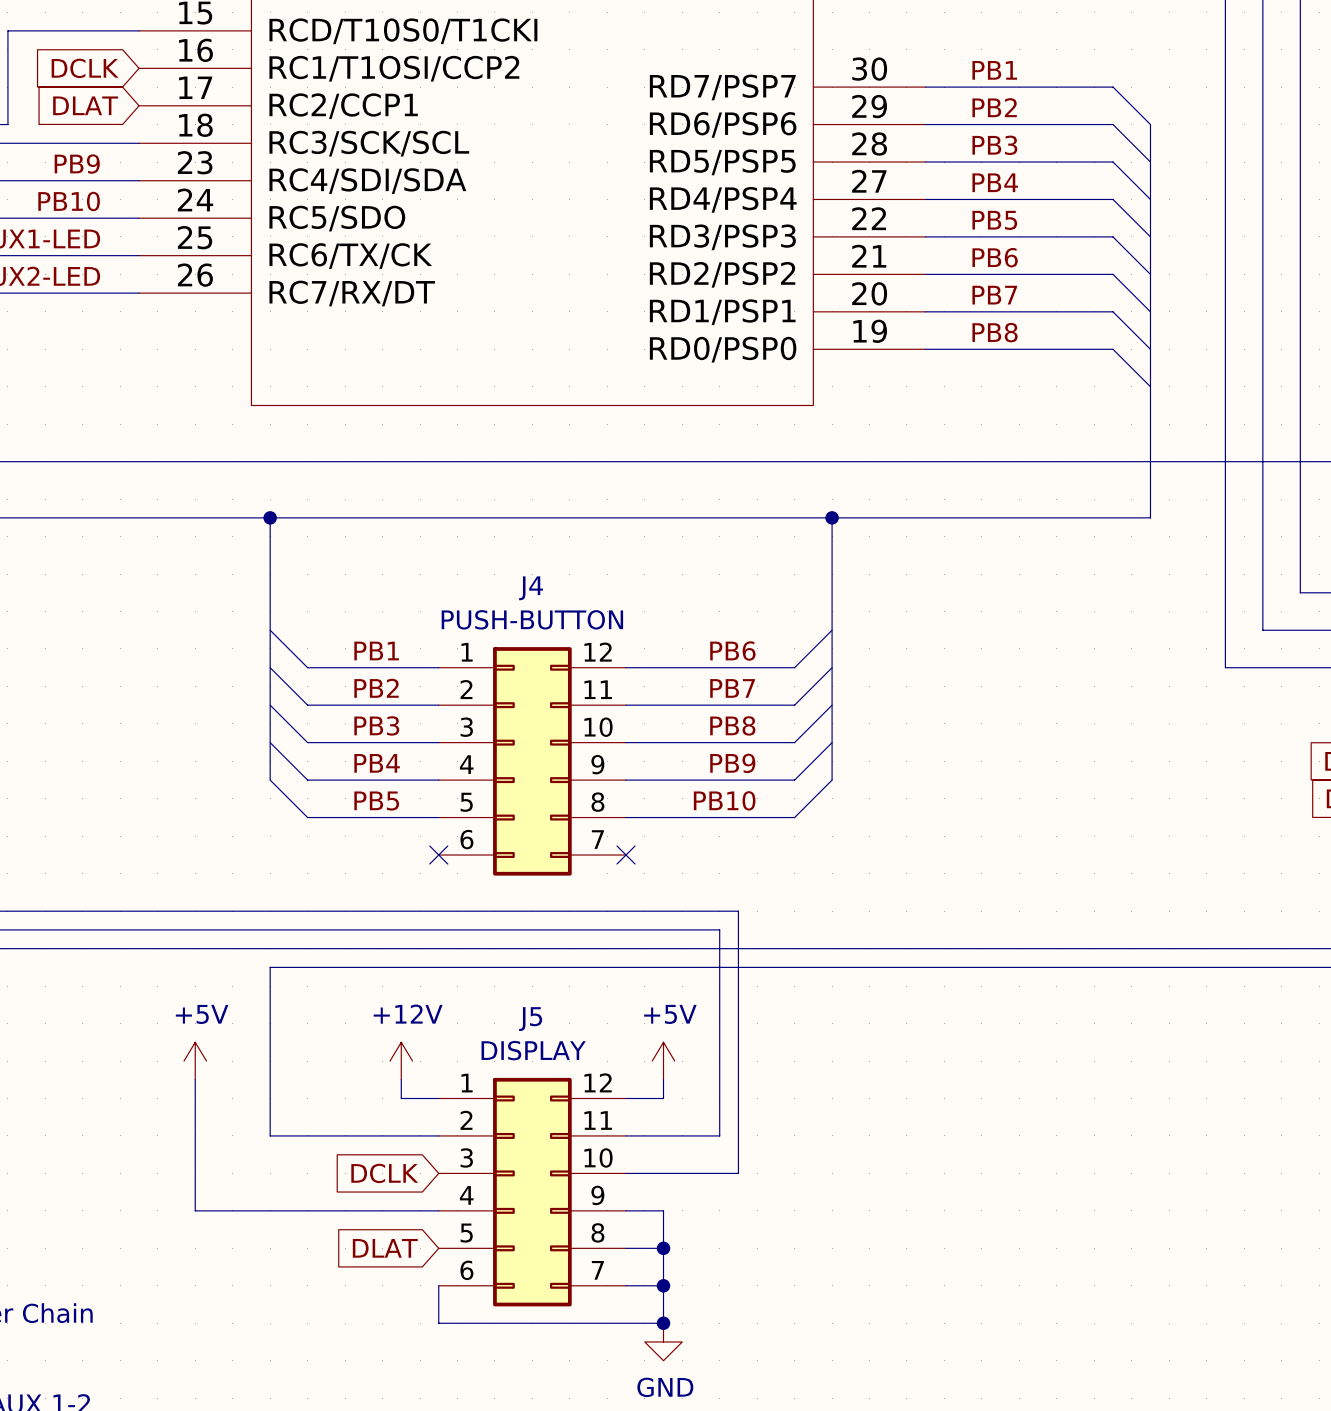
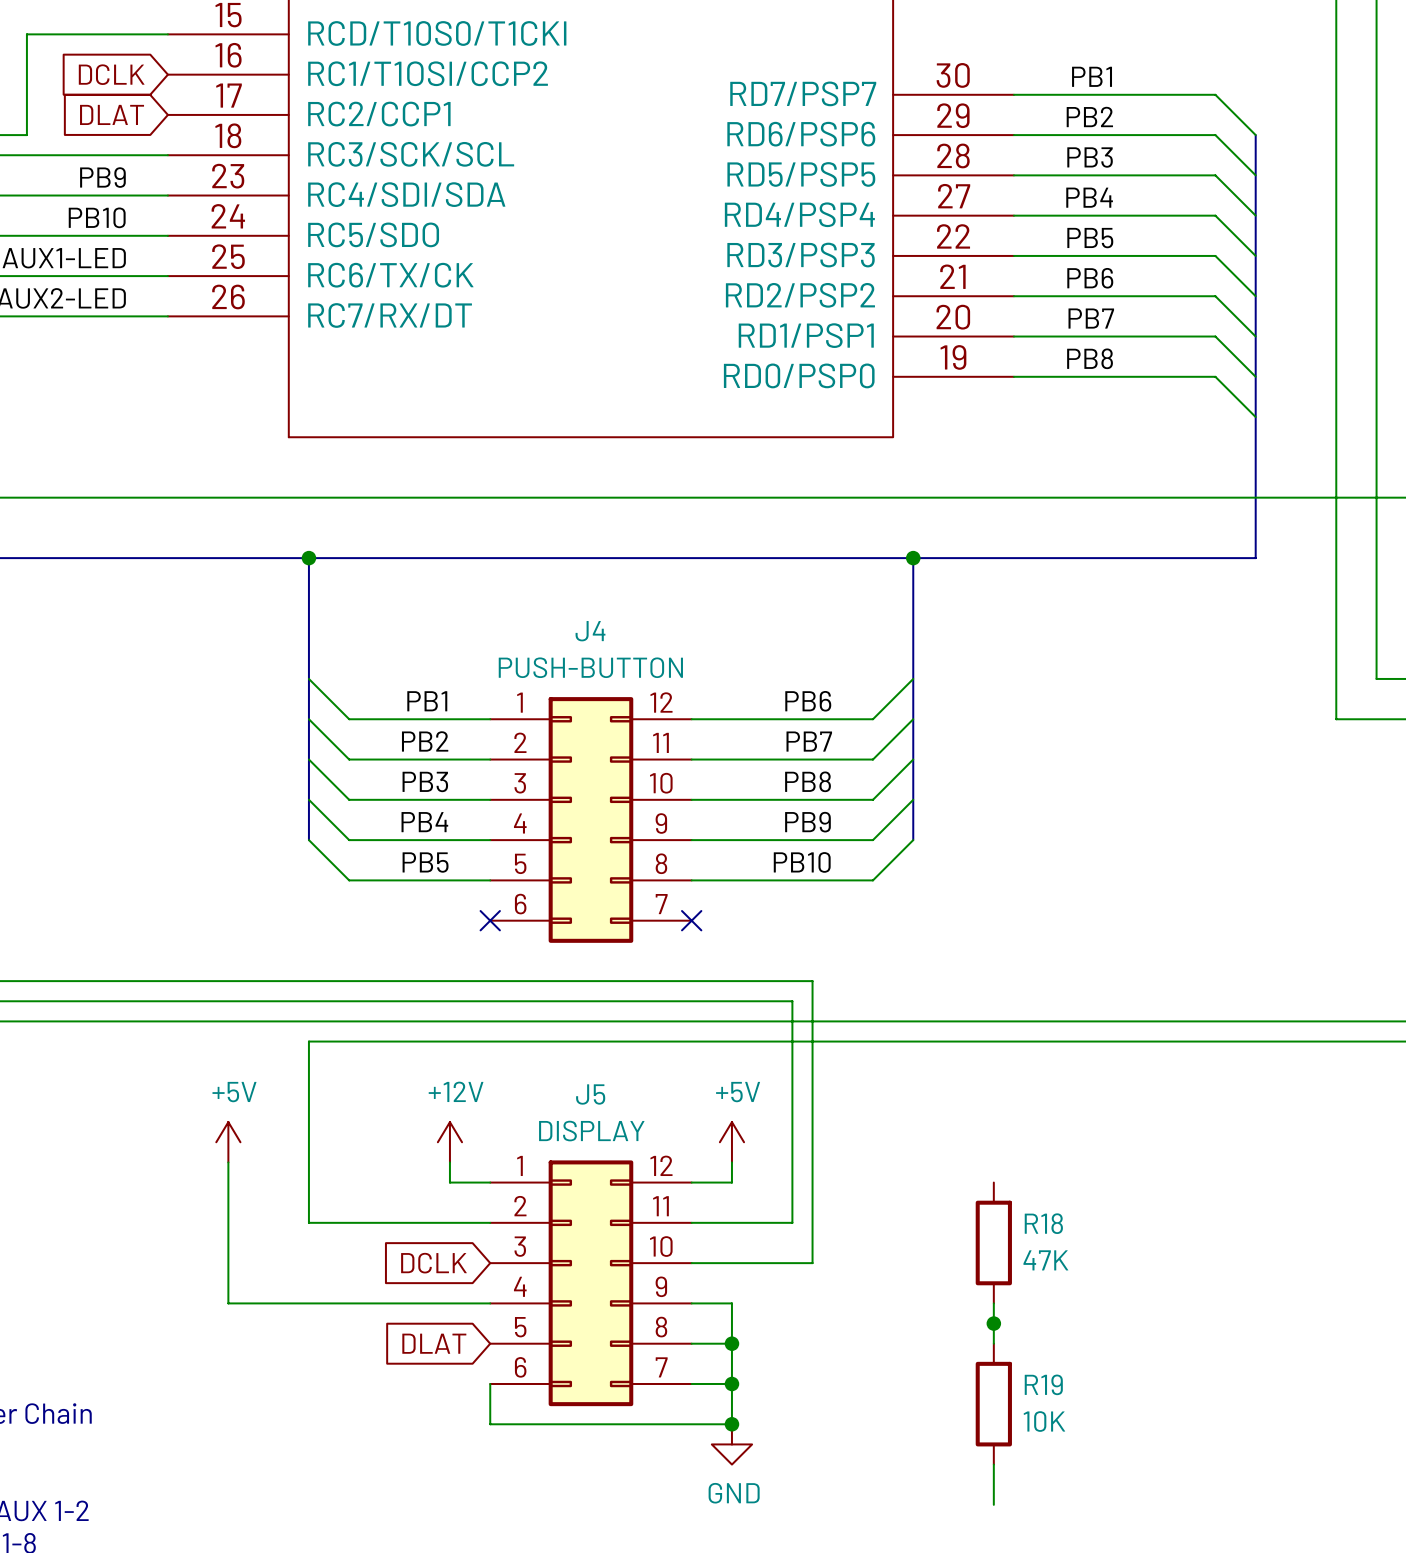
R18: none -> 47K (993, 1242)
wire: none -> (993, 1303) (993, 1343)
junction: none -> (993, 1323)
R19: none -> 10K (993, 1404)
wire: none -> (993, 1464) (993, 1504)

